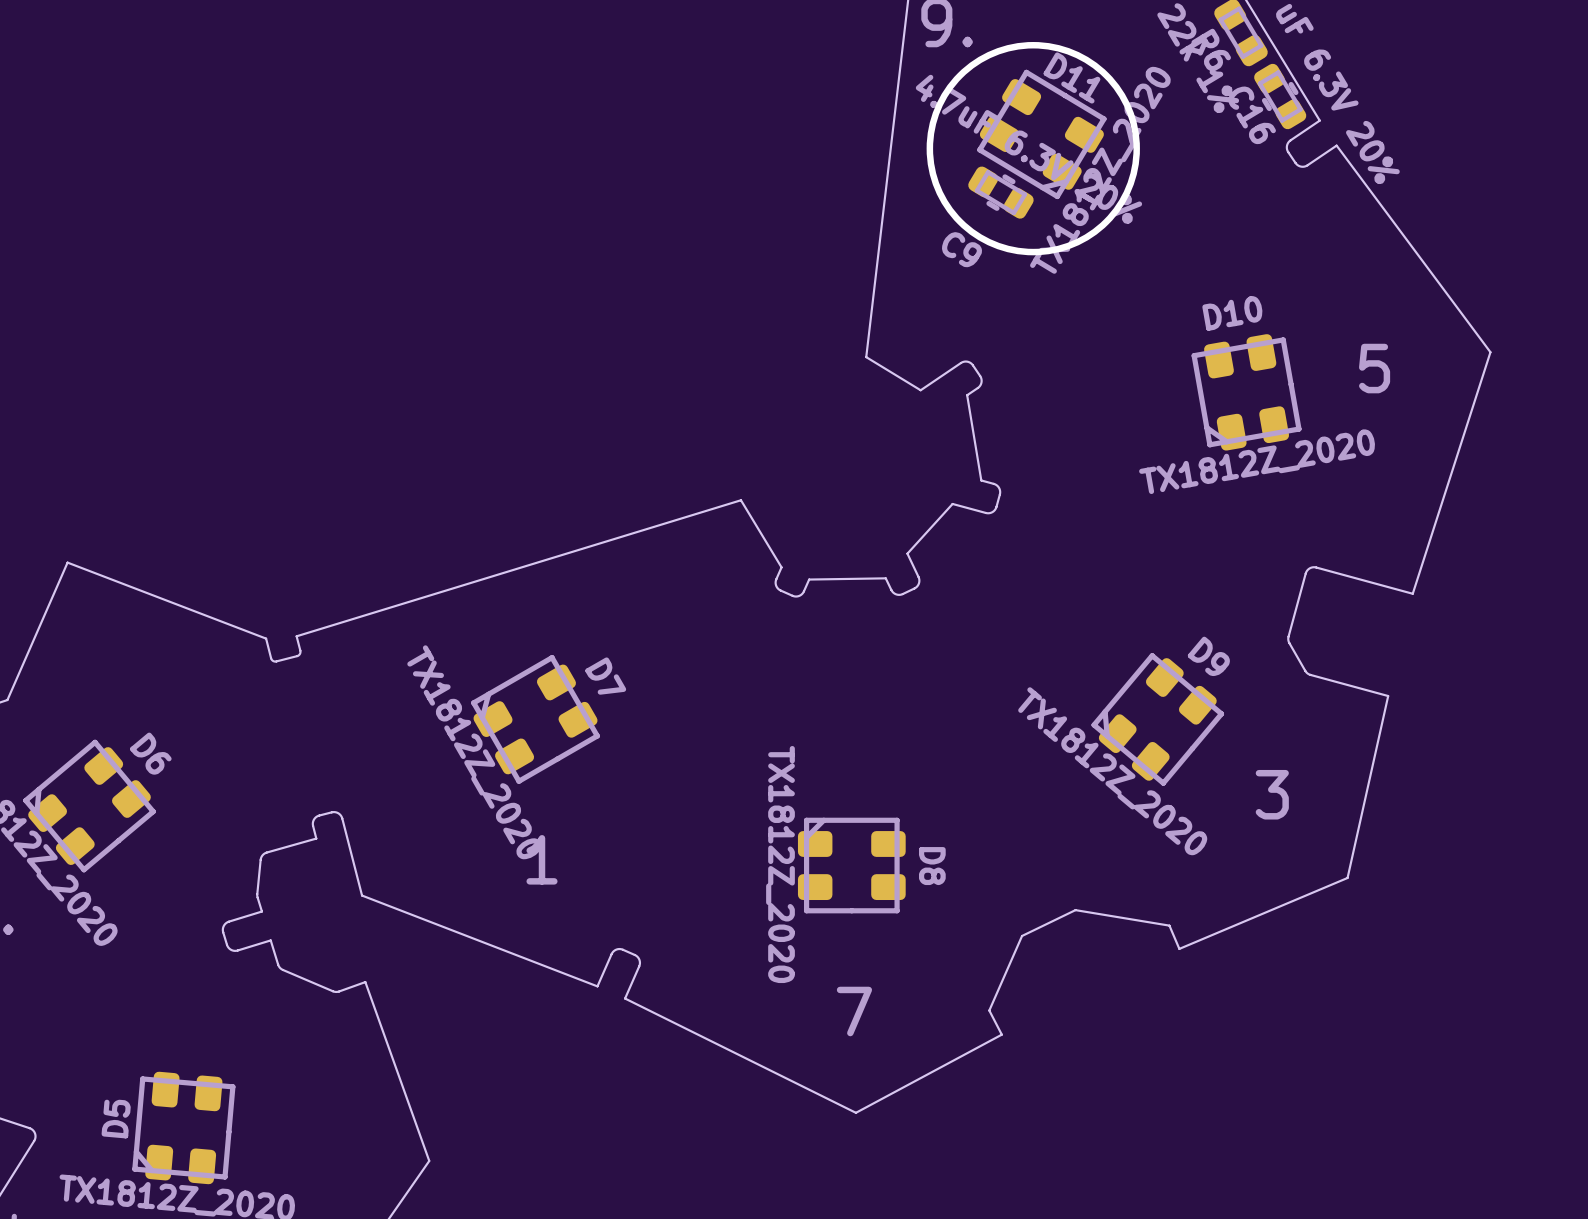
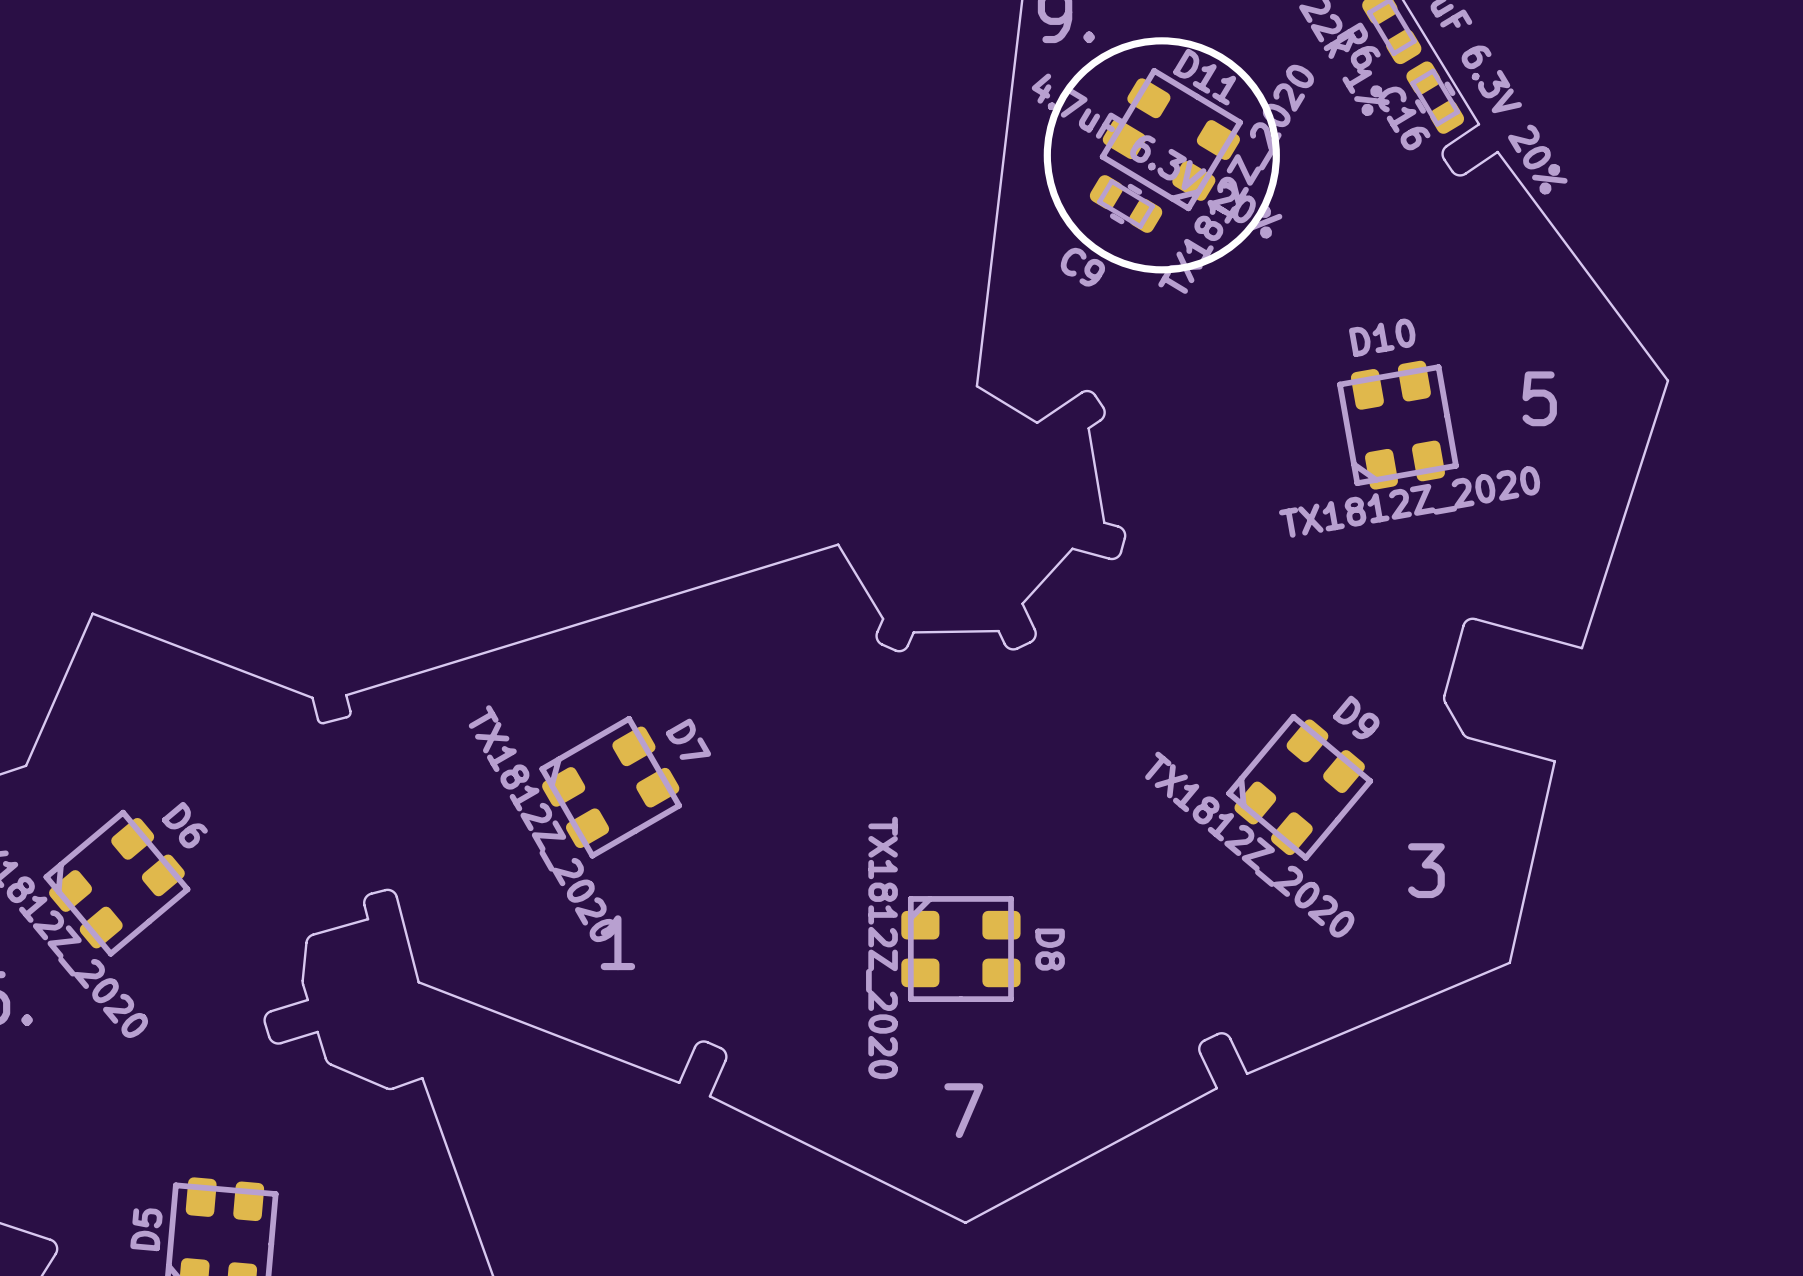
board edge: (1347, 877) (1179, 948) (1169, 925) (1075, 910) (1022, 935) (989, 1010) (1001, 1034) (855, 1112) -> (1230, 1038) (1225, 1034) (1219, 1033) (1203, 1040) (1199, 1046) (1200, 1053) (1216, 1088) (965, 1222)
board edge: none -> (1509, 962) (1247, 1073) (1230, 1038)

